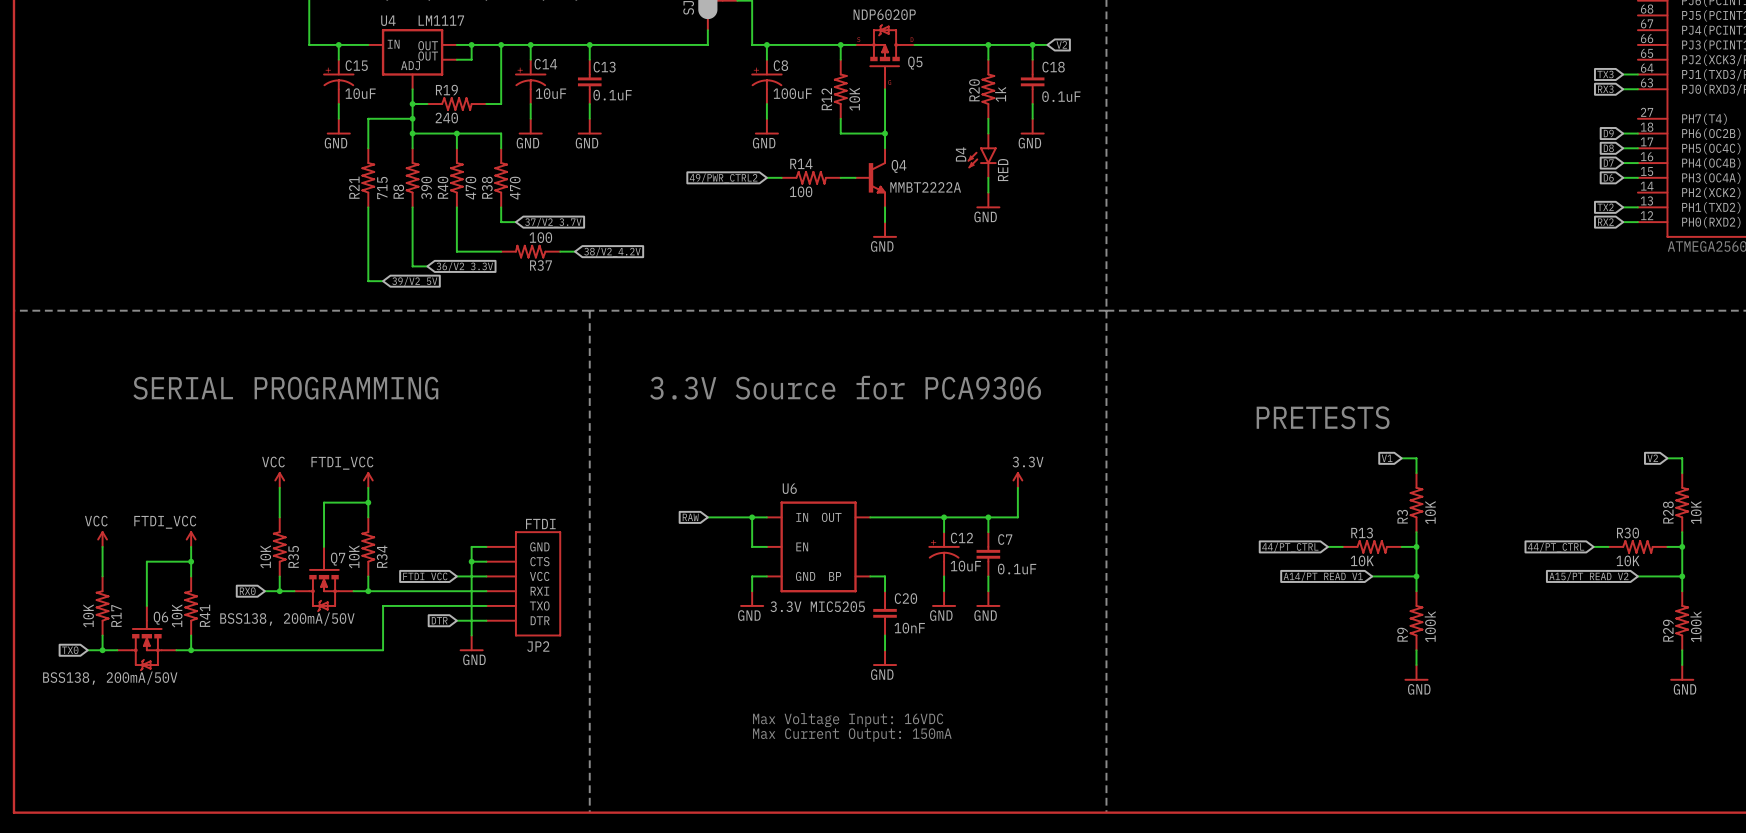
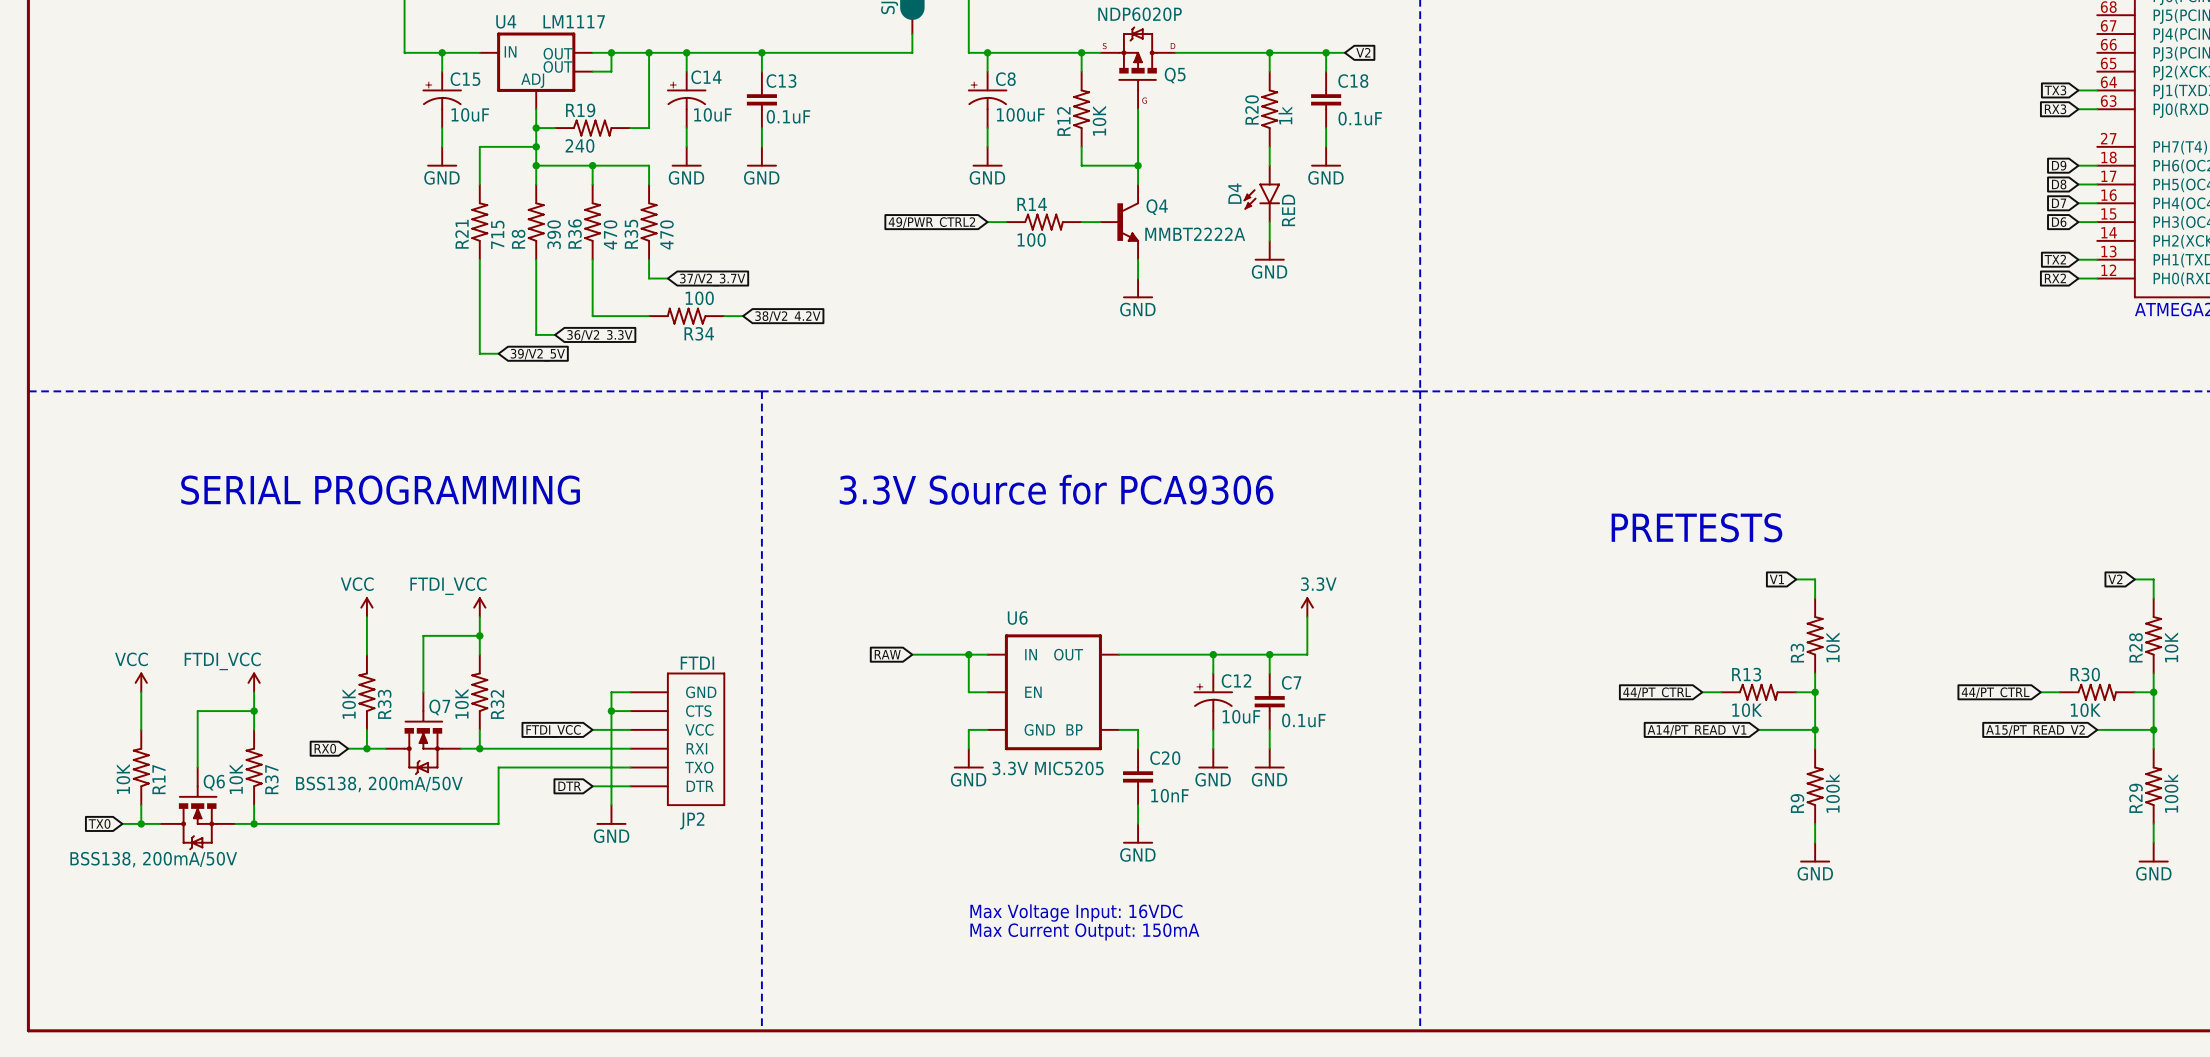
R40 name: R40 (443, 187) -> R36 (574, 234)
R38 name: R38 (487, 187) -> R35 (631, 234)
R37 name: R37 (540, 265) -> R34 (699, 333)
R35 name: R35 (293, 556) -> R33 (384, 704)
R34 name: R34 (382, 556) -> R32 (497, 704)
R41 name: R41 (205, 615) -> R37 (271, 779)

